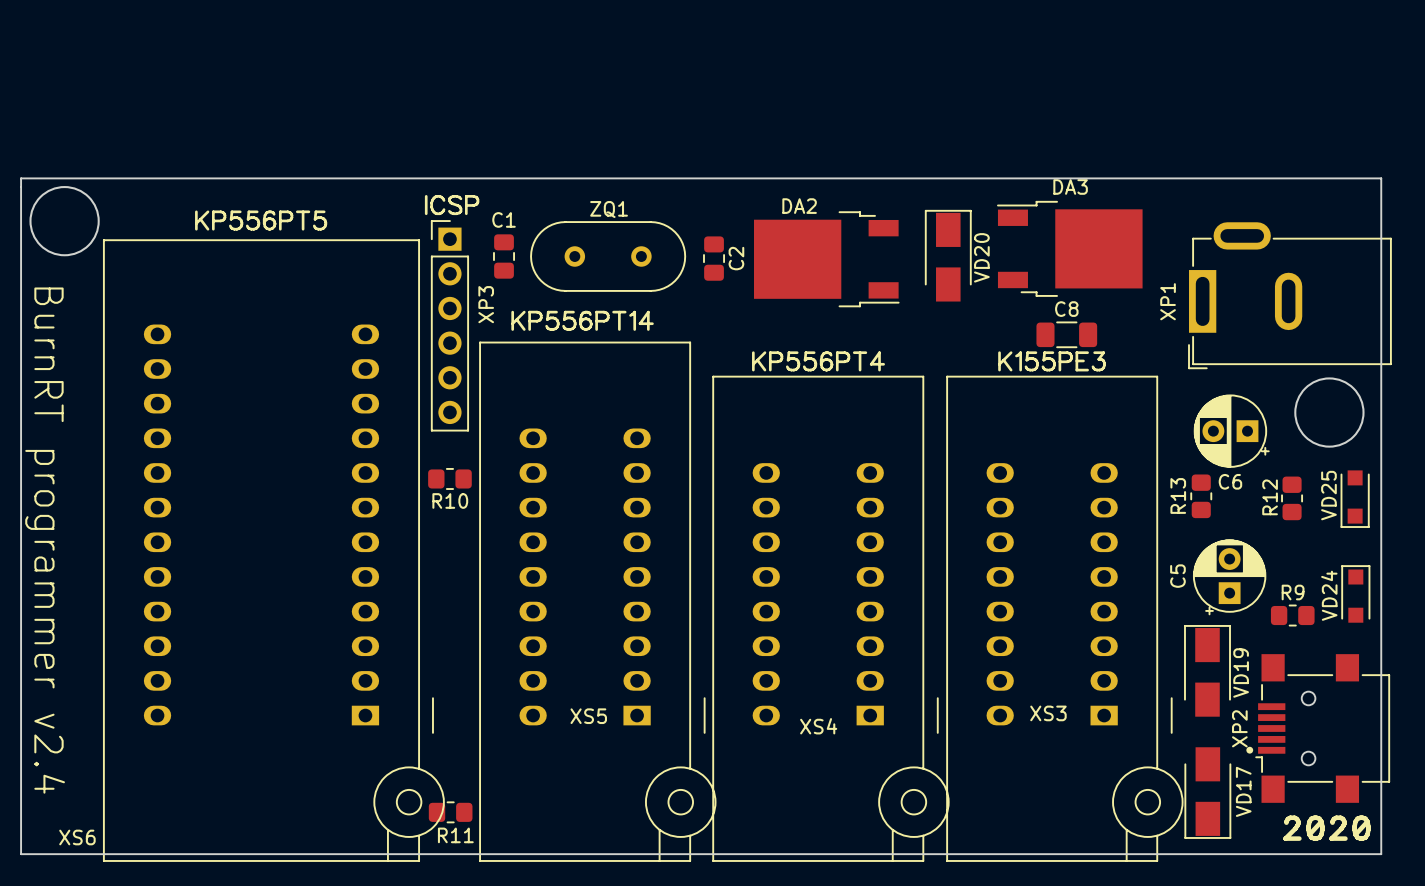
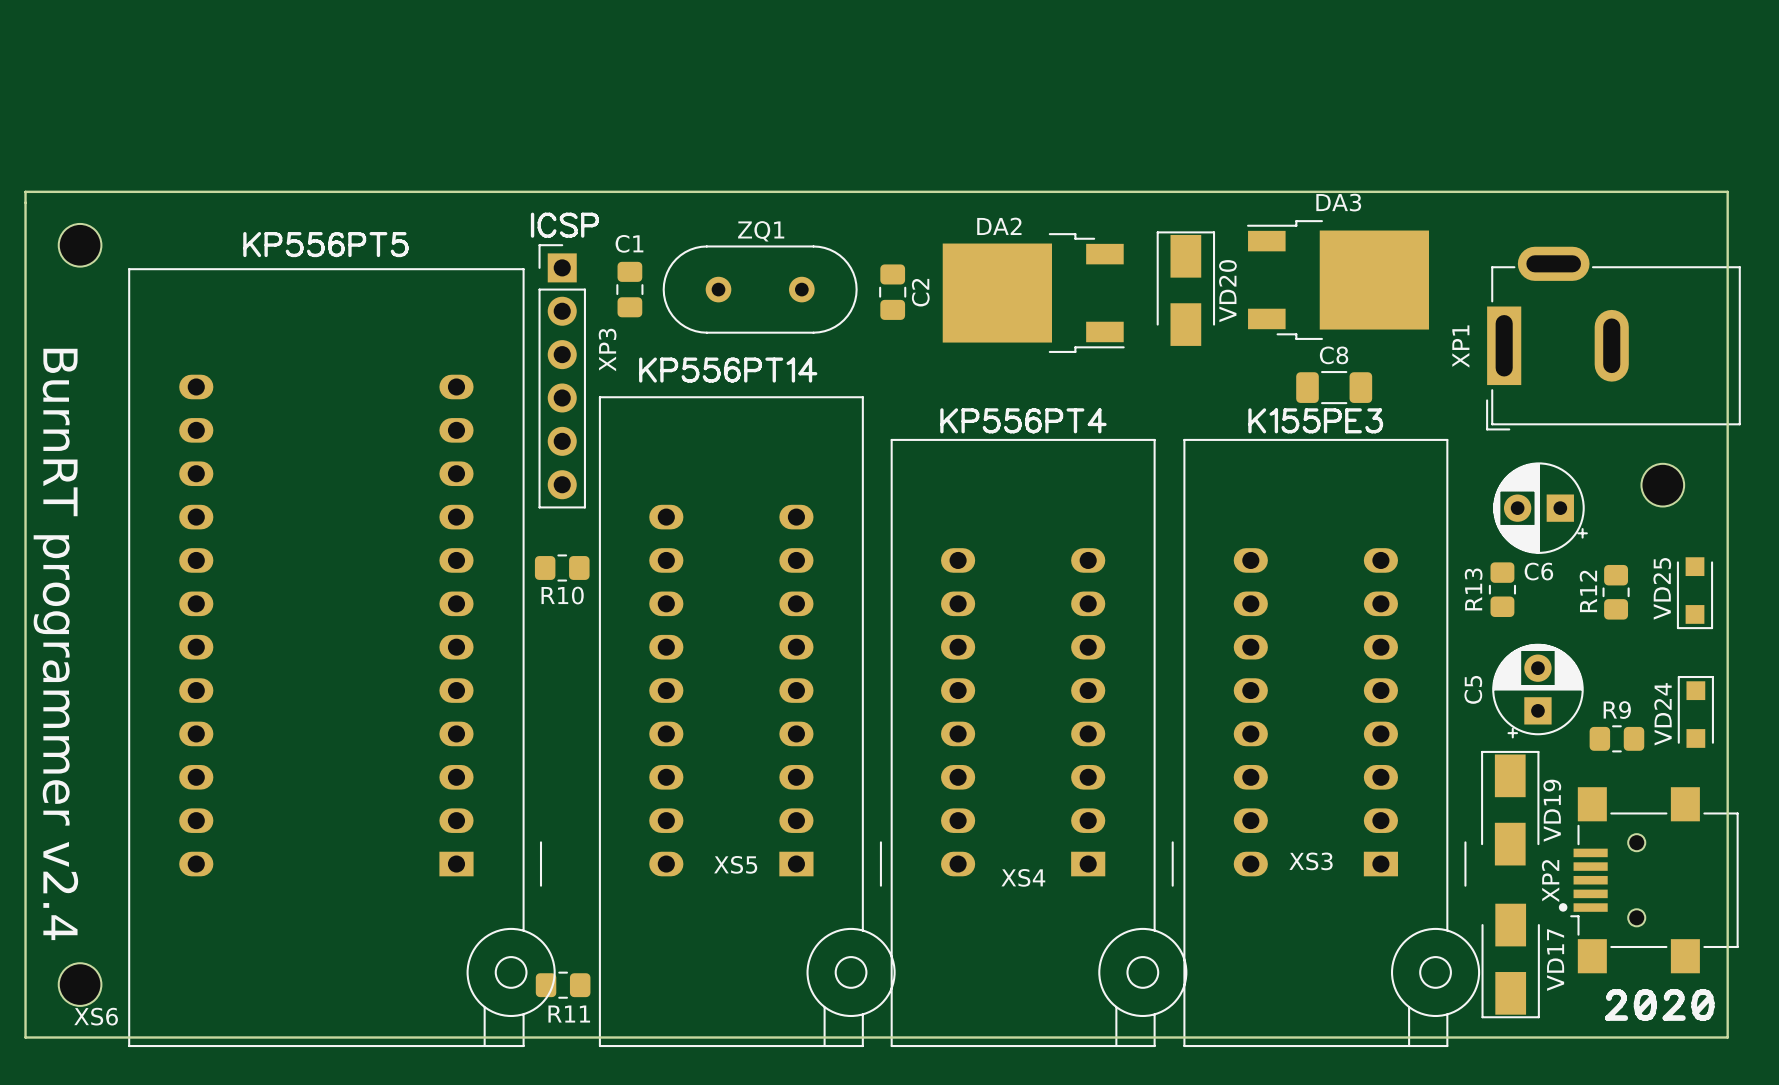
round board edge: [29, 186, 100, 257] -> none
part: none -> (80, 245)
round board edge: [1294, 377, 1365, 448] -> none
part: none -> (1662, 485)
part: none -> (80, 984)

